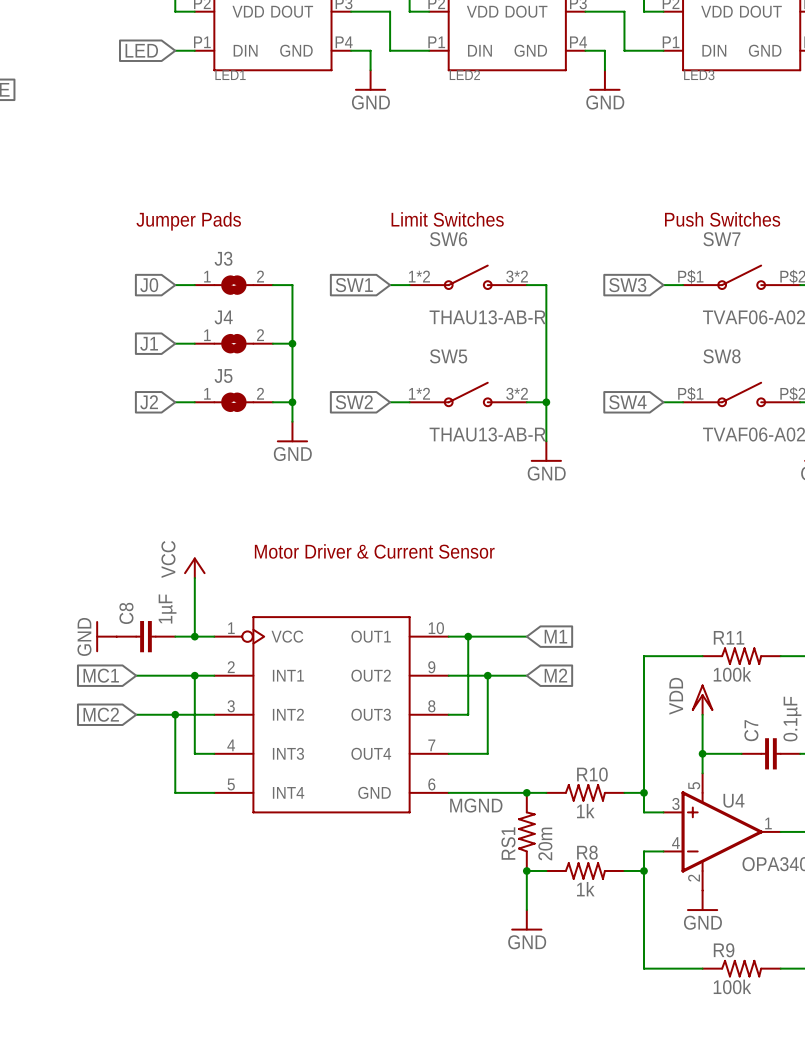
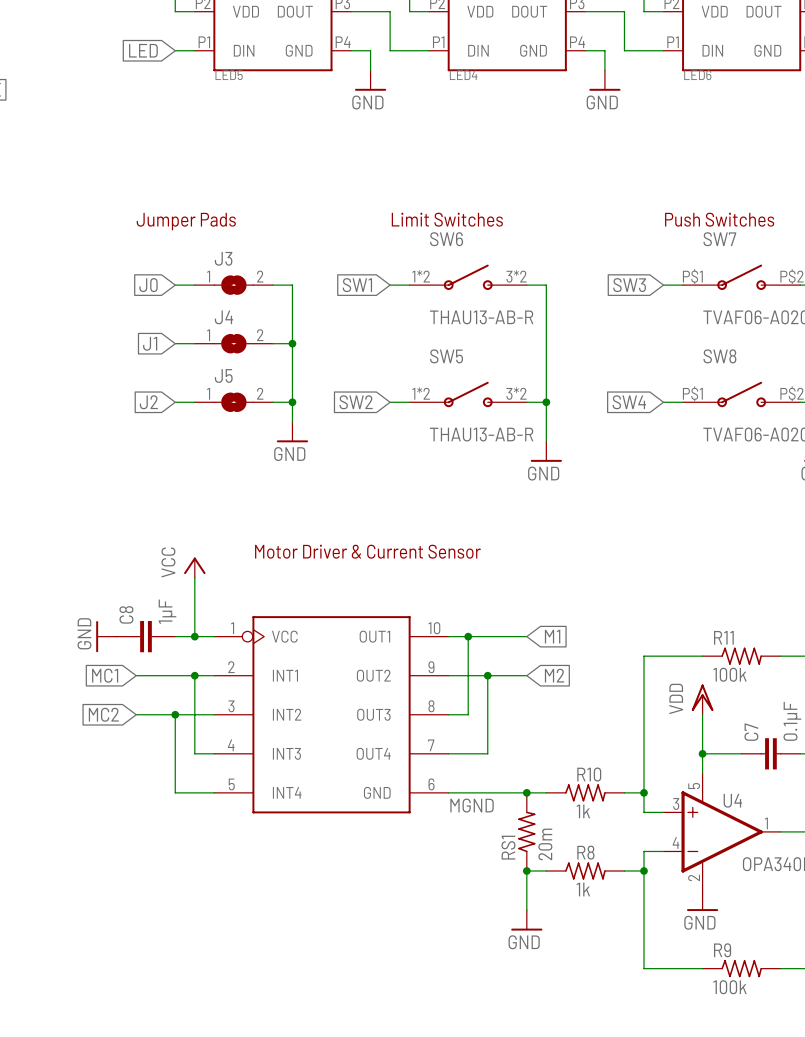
LED1 name: LED1 (230, 75) -> LED5 (229, 75)
LED2 name: LED2 (464, 75) -> LED4 (463, 75)
LED3 name: LED3 (699, 75) -> LED6 (697, 75)

